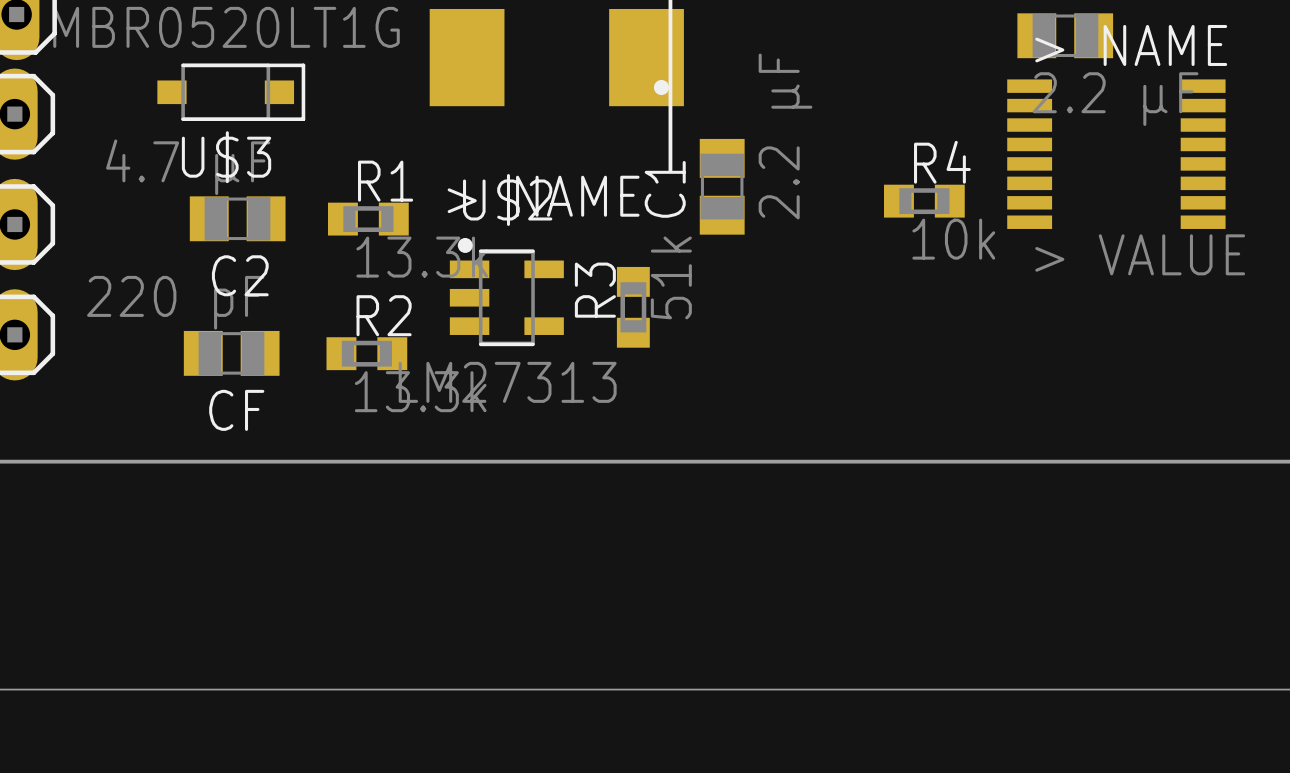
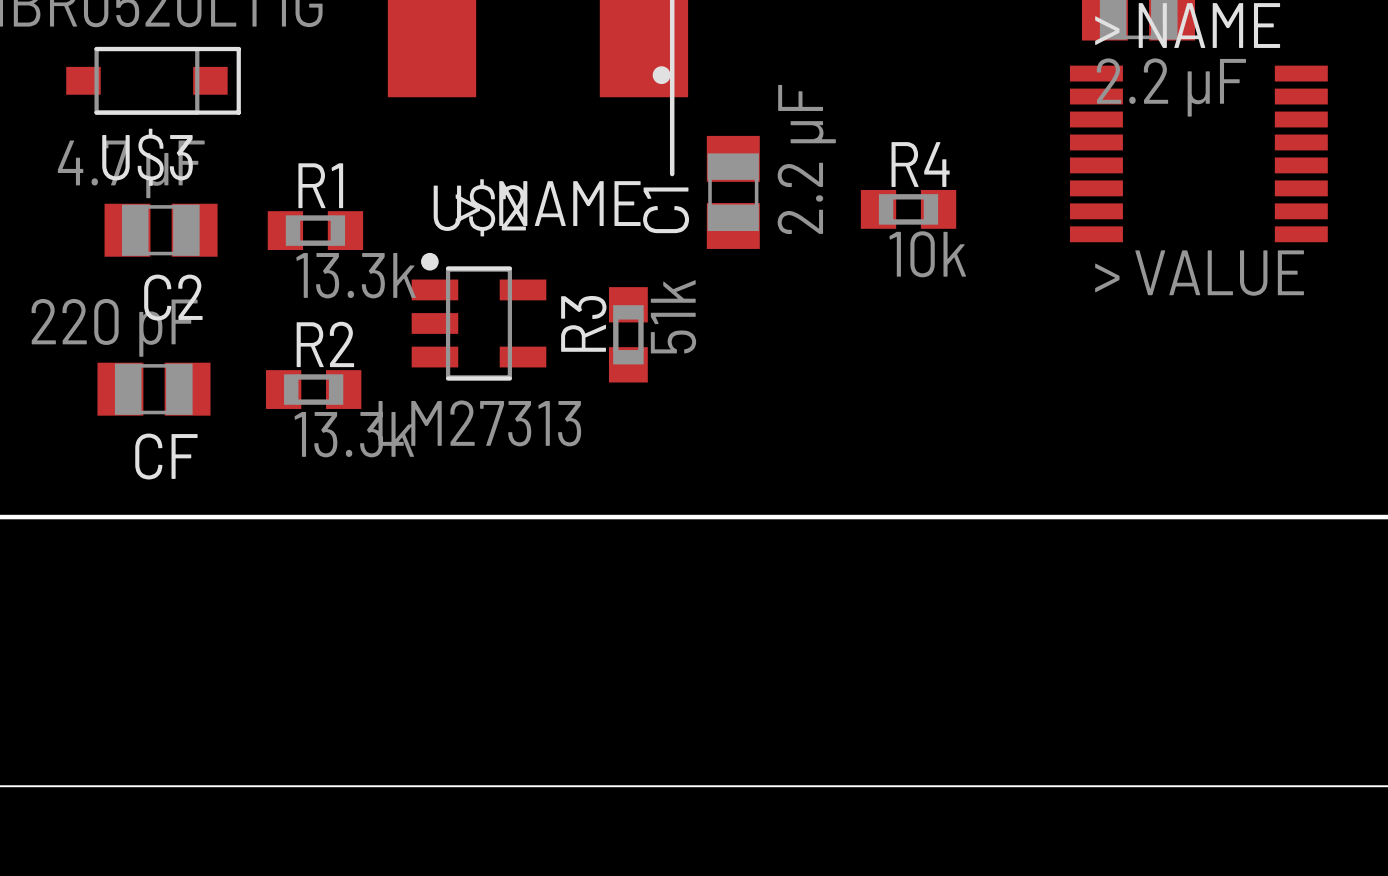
R4 position: (924, 201) -> (908, 209)

